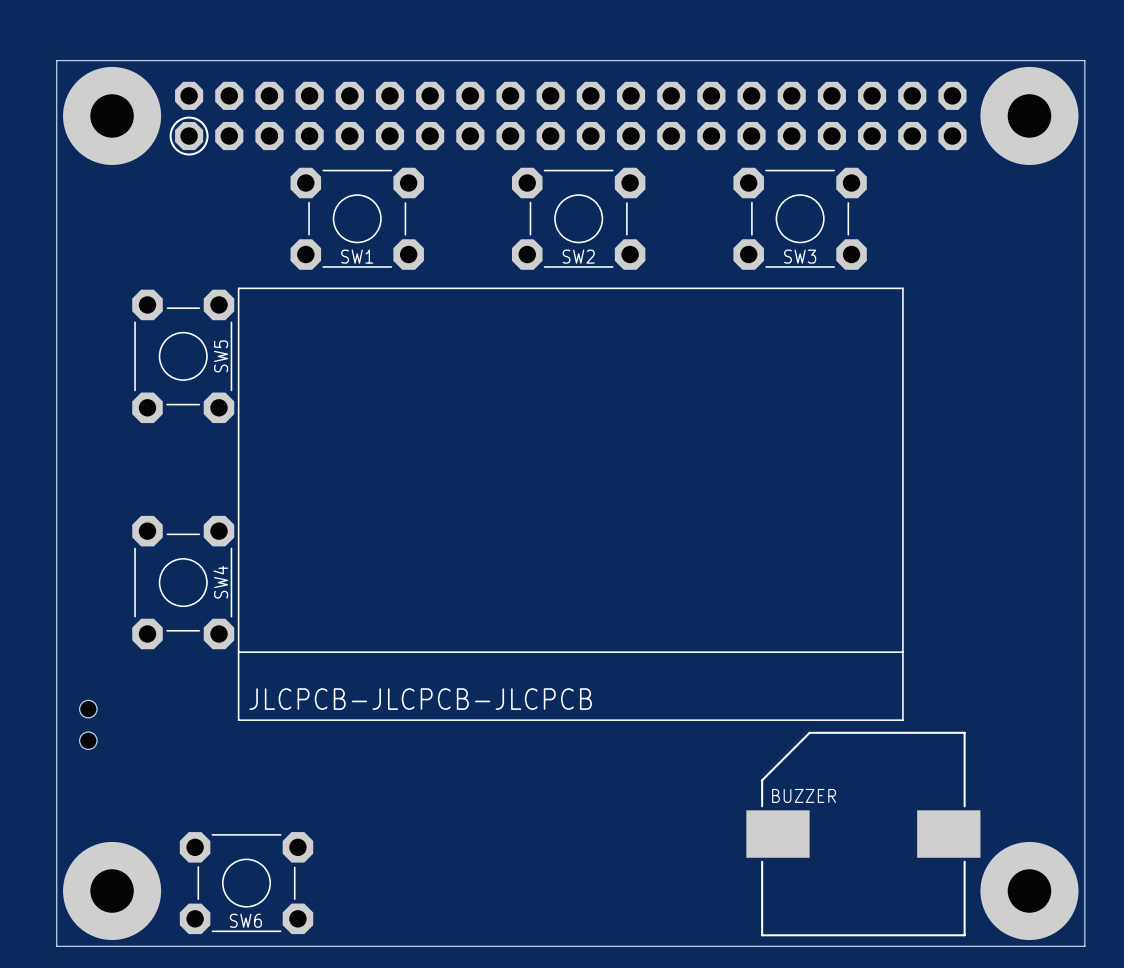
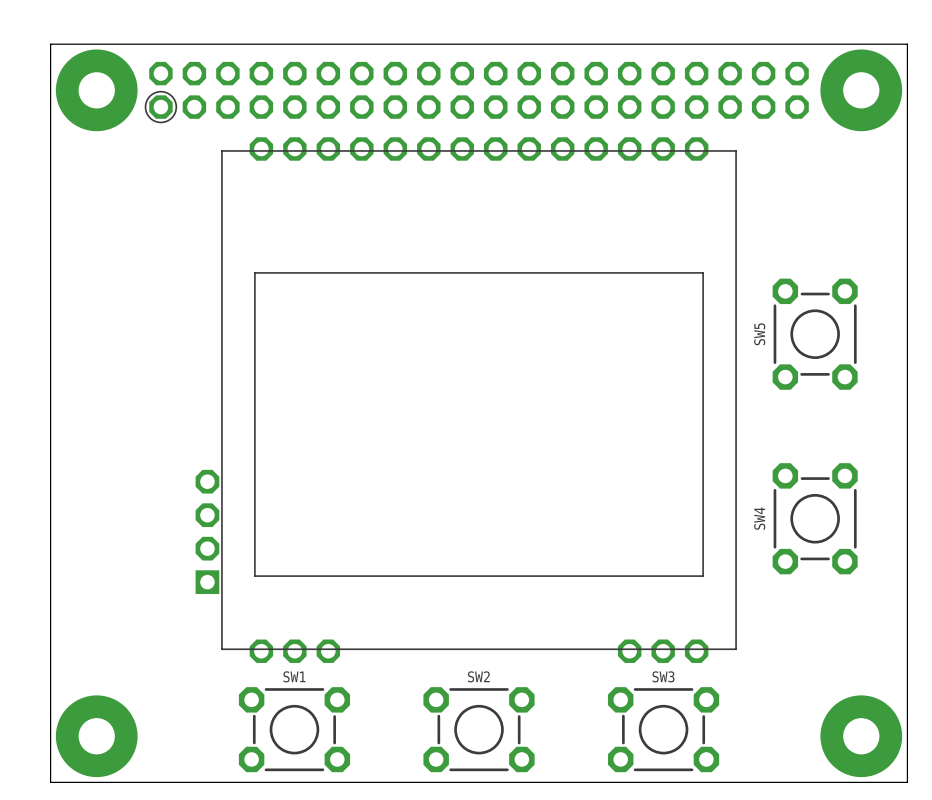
SW1 footprint: [290, 167, 424, 270] -> [238, 687, 351, 773]
SW2 footprint: [511, 167, 646, 270] -> [423, 687, 535, 773]
SW3 footprint: [733, 167, 867, 270] -> [607, 687, 720, 773]
SW1 name position: SW1 (357, 256) -> SW1 (294, 676)
SW2 name position: SW2 (578, 256) -> SW2 (478, 676)
SW3 name position: SW3 (800, 256) -> SW3 (663, 676)
drawing: [237, 287, 904, 721] -> none
SW5 footprint: [132, 289, 235, 424] -> [772, 278, 858, 390]
SW5 name position: SW5 (221, 356) -> SW5 (759, 334)
part: none -> (479, 400)
SW4 footprint: [132, 515, 235, 650] -> [772, 463, 858, 575]
SW4 name position: SW4 (220, 582) -> SW4 (759, 518)
part: none -> (207, 531)
text: JLCPCB-JLCPCB-JLCPCB (420, 699) -> none
hole: (88, 709) -> none
hole: (88, 740) -> none
BUZZER: (863, 834) -> none
SW6: (246, 883) -> none

